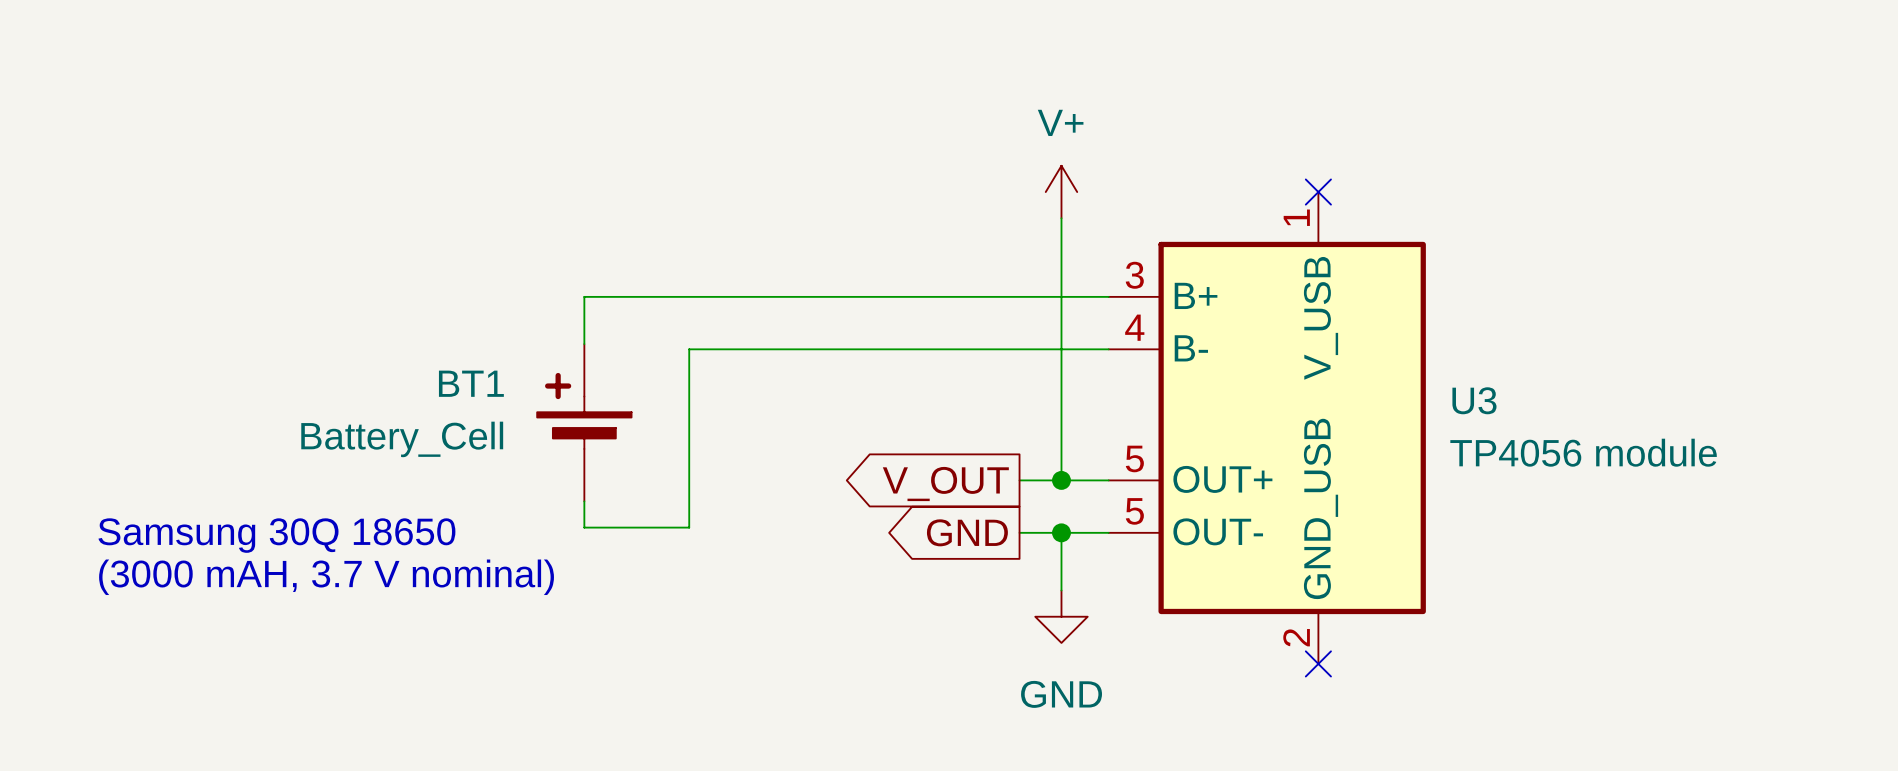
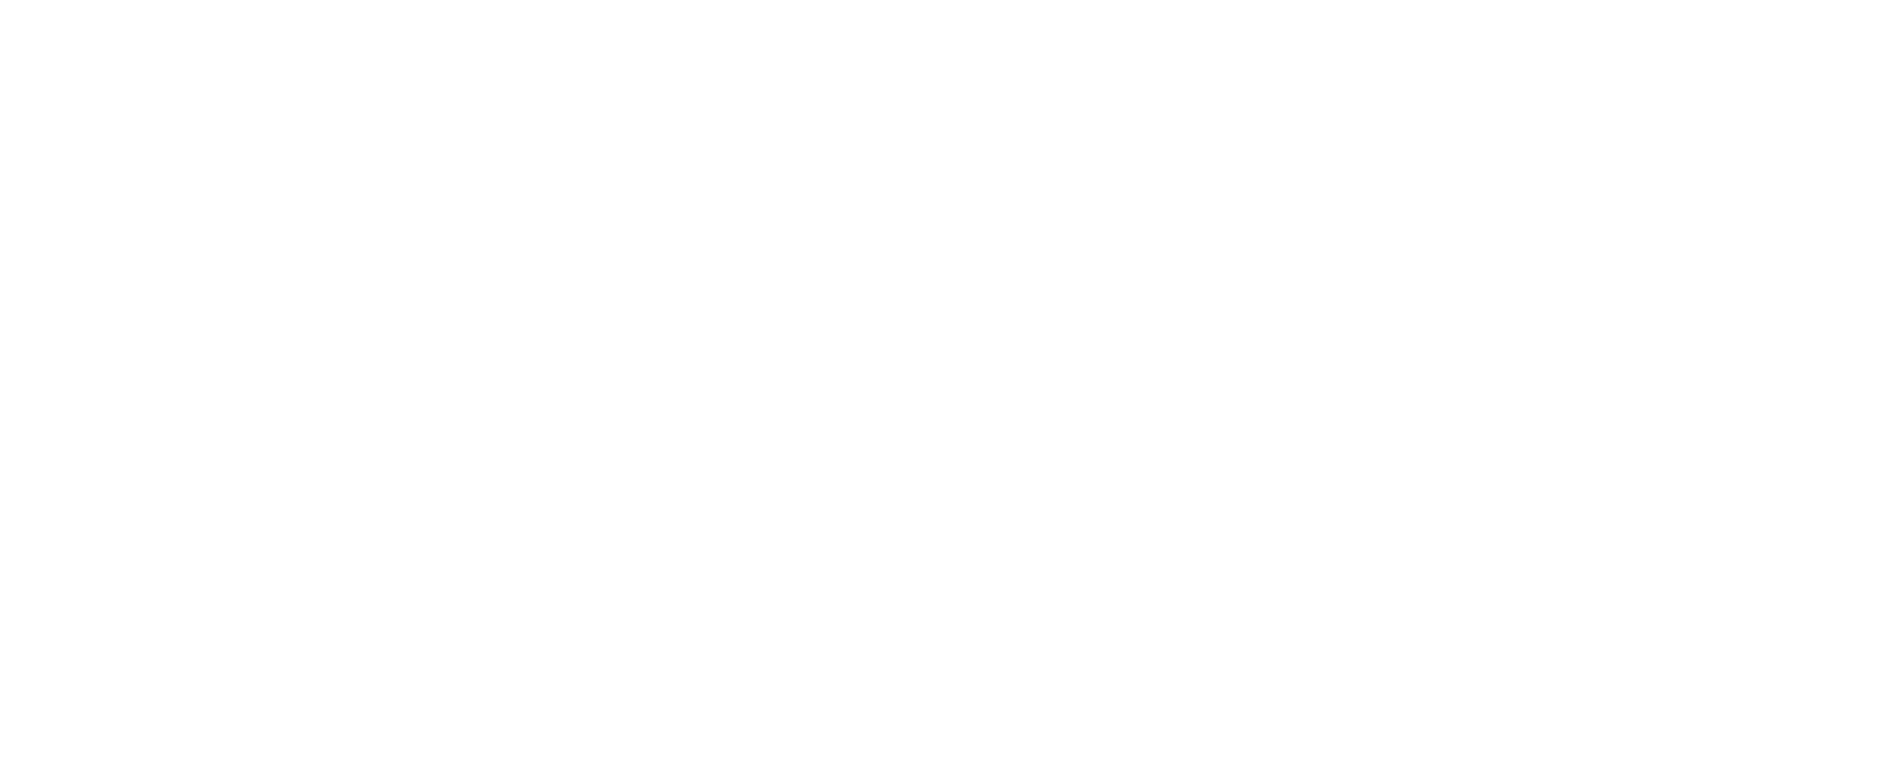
power symbol: V+ (1061, 192) -> none
no-connect mark: (1318, 192) -> none
wire: (1061, 218) (1061, 480) -> none
wire: (1108, 296) (584, 296) (584, 344) -> none
wire: (1108, 349) (689, 349) (689, 527) (584, 527) (584, 501) -> none
BT1: Battery_Cell (584, 422) -> none
U3: TP4056 module (1267, 427) -> none
wire: (1019, 480) (1108, 480) -> none
junction: (1061, 480) -> none
global label: V_OUT (945, 484) -> none
global label: GND (967, 532) -> none
wire: (1019, 532) (1108, 532) -> none
wire: (1061, 532) (1061, 590) -> none
junction: (1061, 532) -> none
text: Samsung 30Q 18650 (276, 535) -> none
text: (3000 mAH, 3.7 V nominal) (326, 577) -> none
power symbol: GND (1061, 616) -> none
no-connect mark: (1318, 663) -> none

